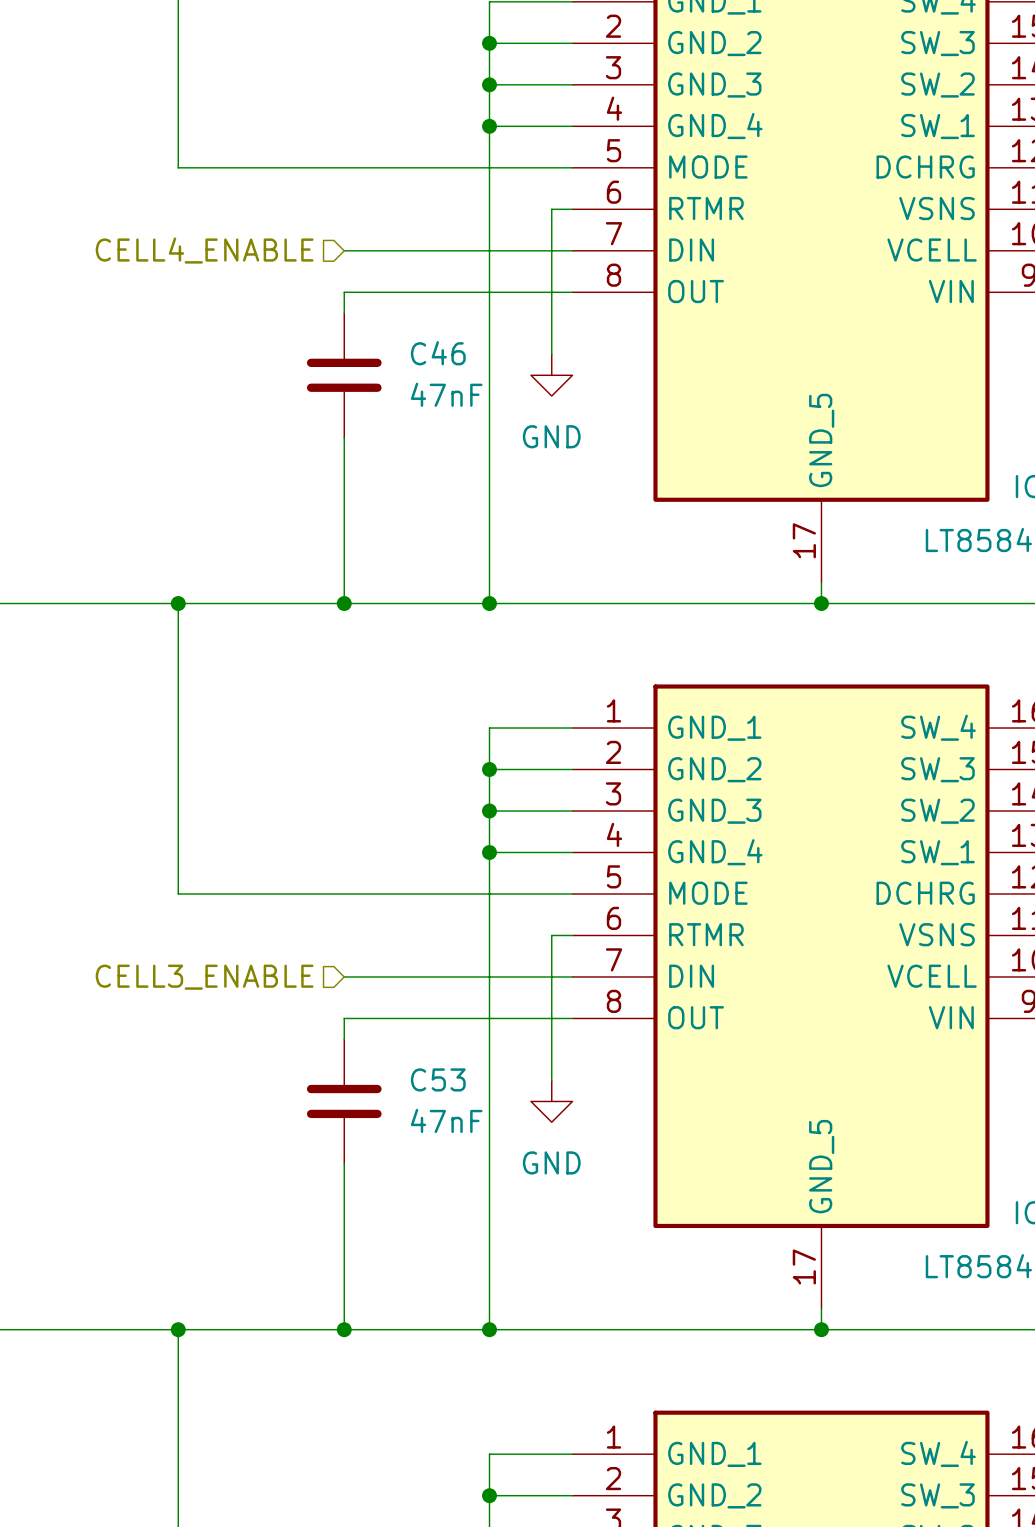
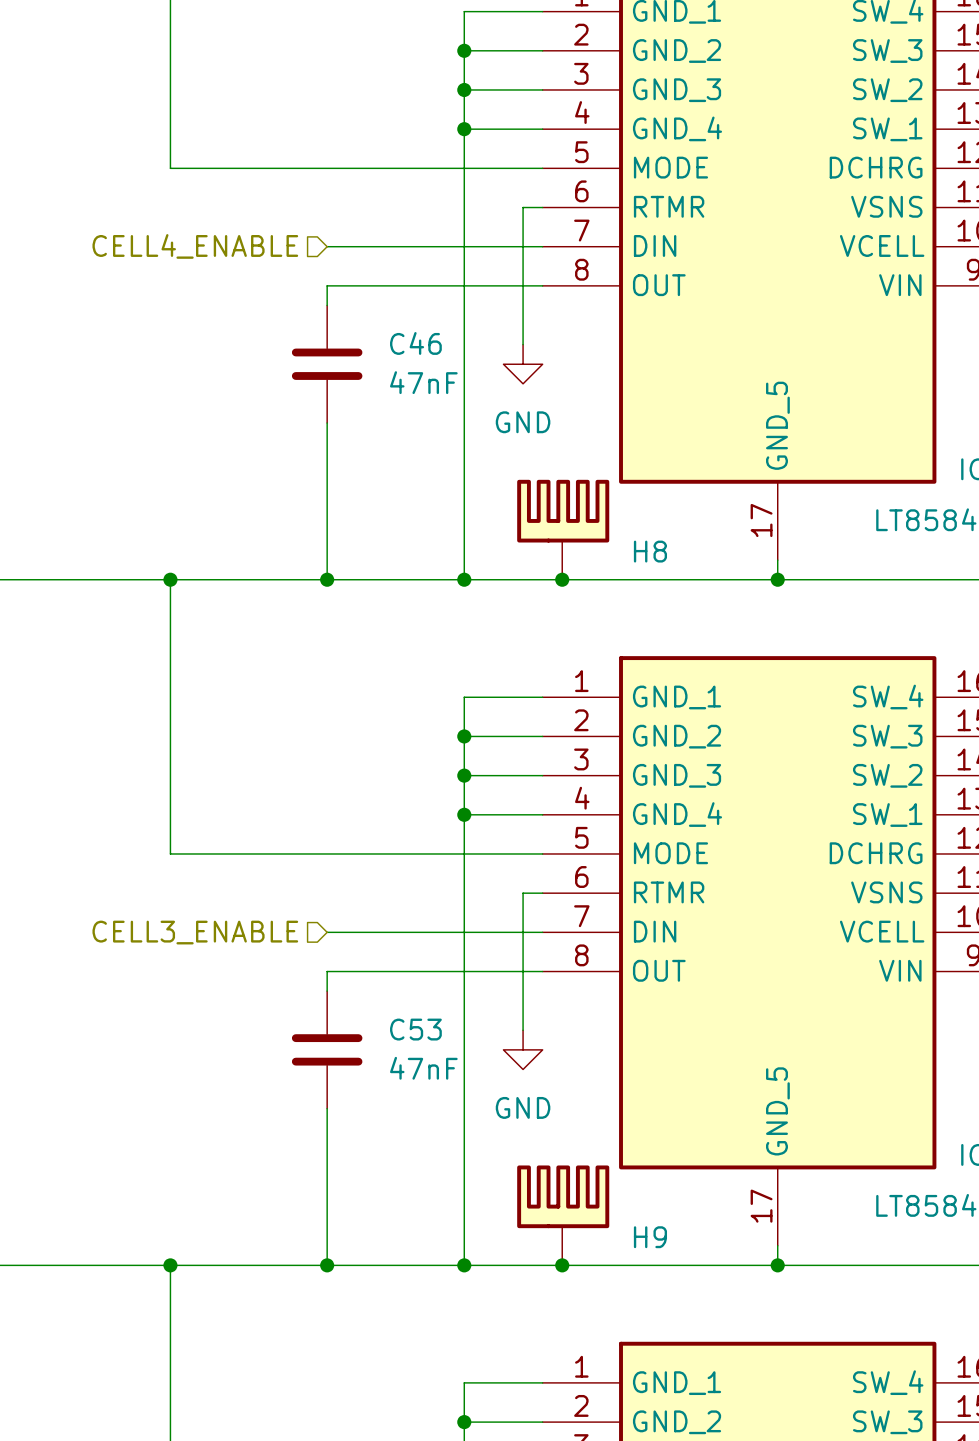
H8: none -> (563, 529)
junction: none -> (562, 579)
H9: none -> (563, 1215)
junction: none -> (562, 1265)

